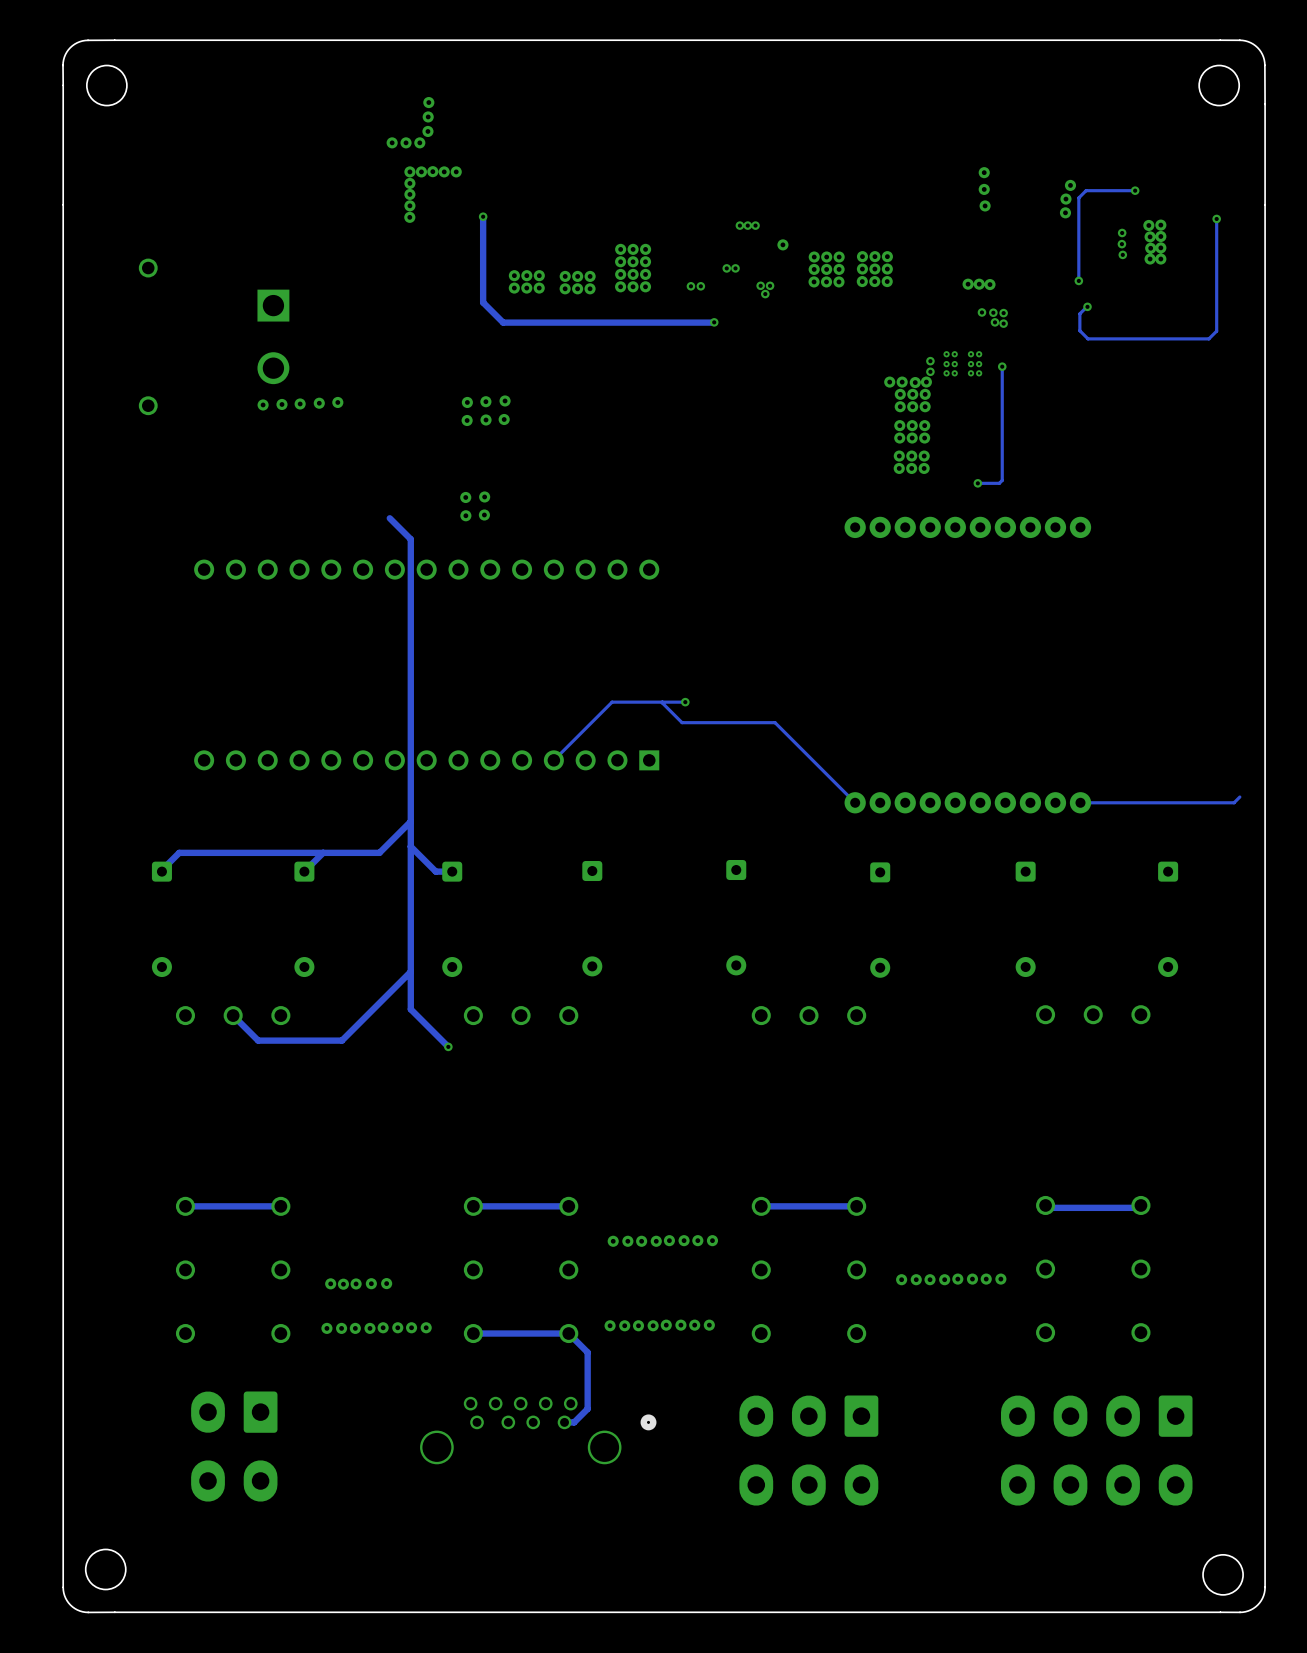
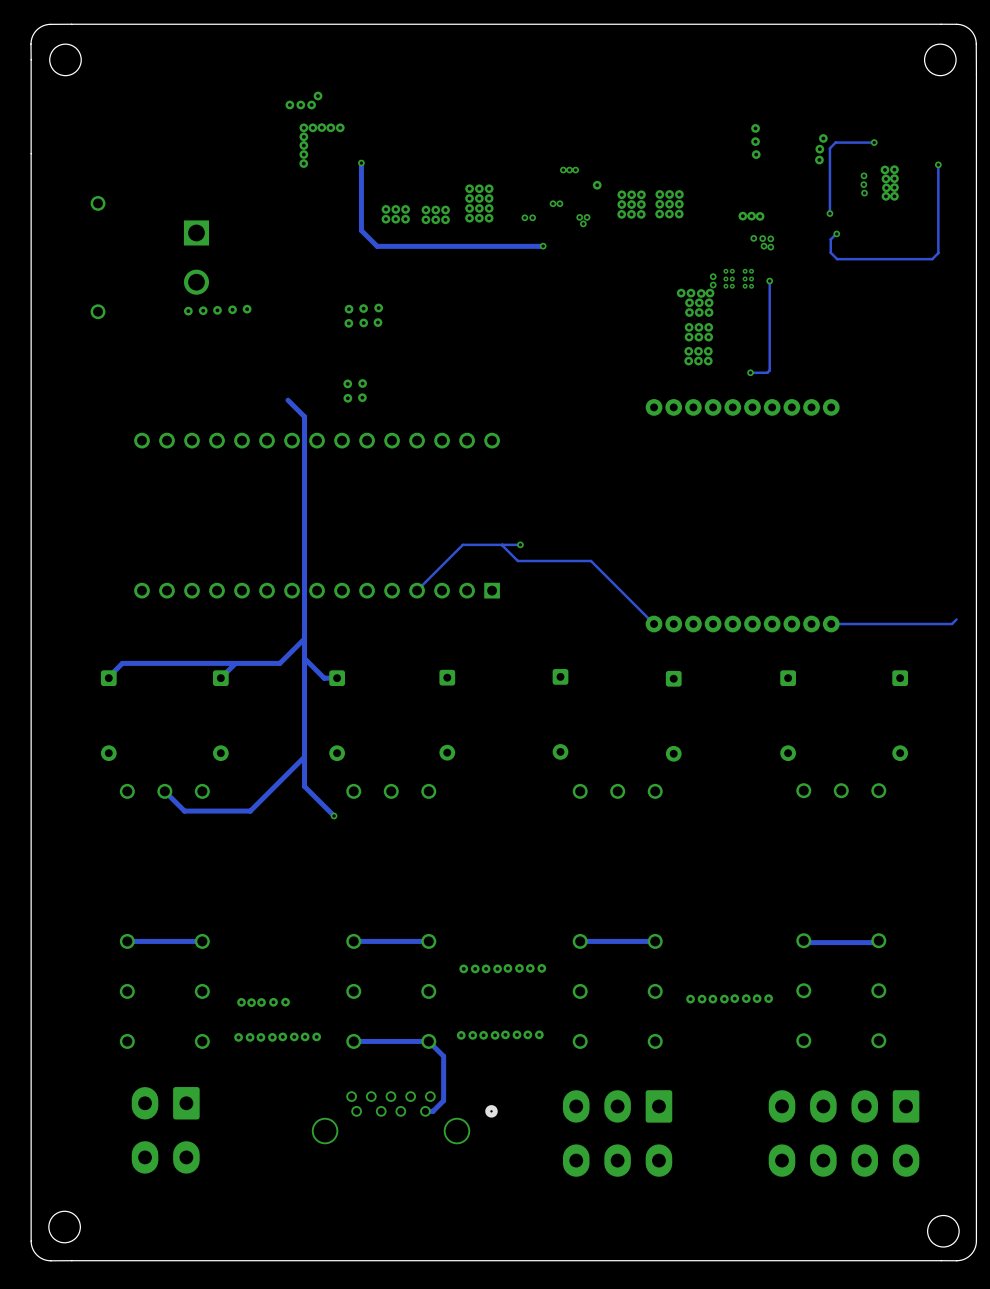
via: (428, 102) -> none
via: (428, 116) -> none

